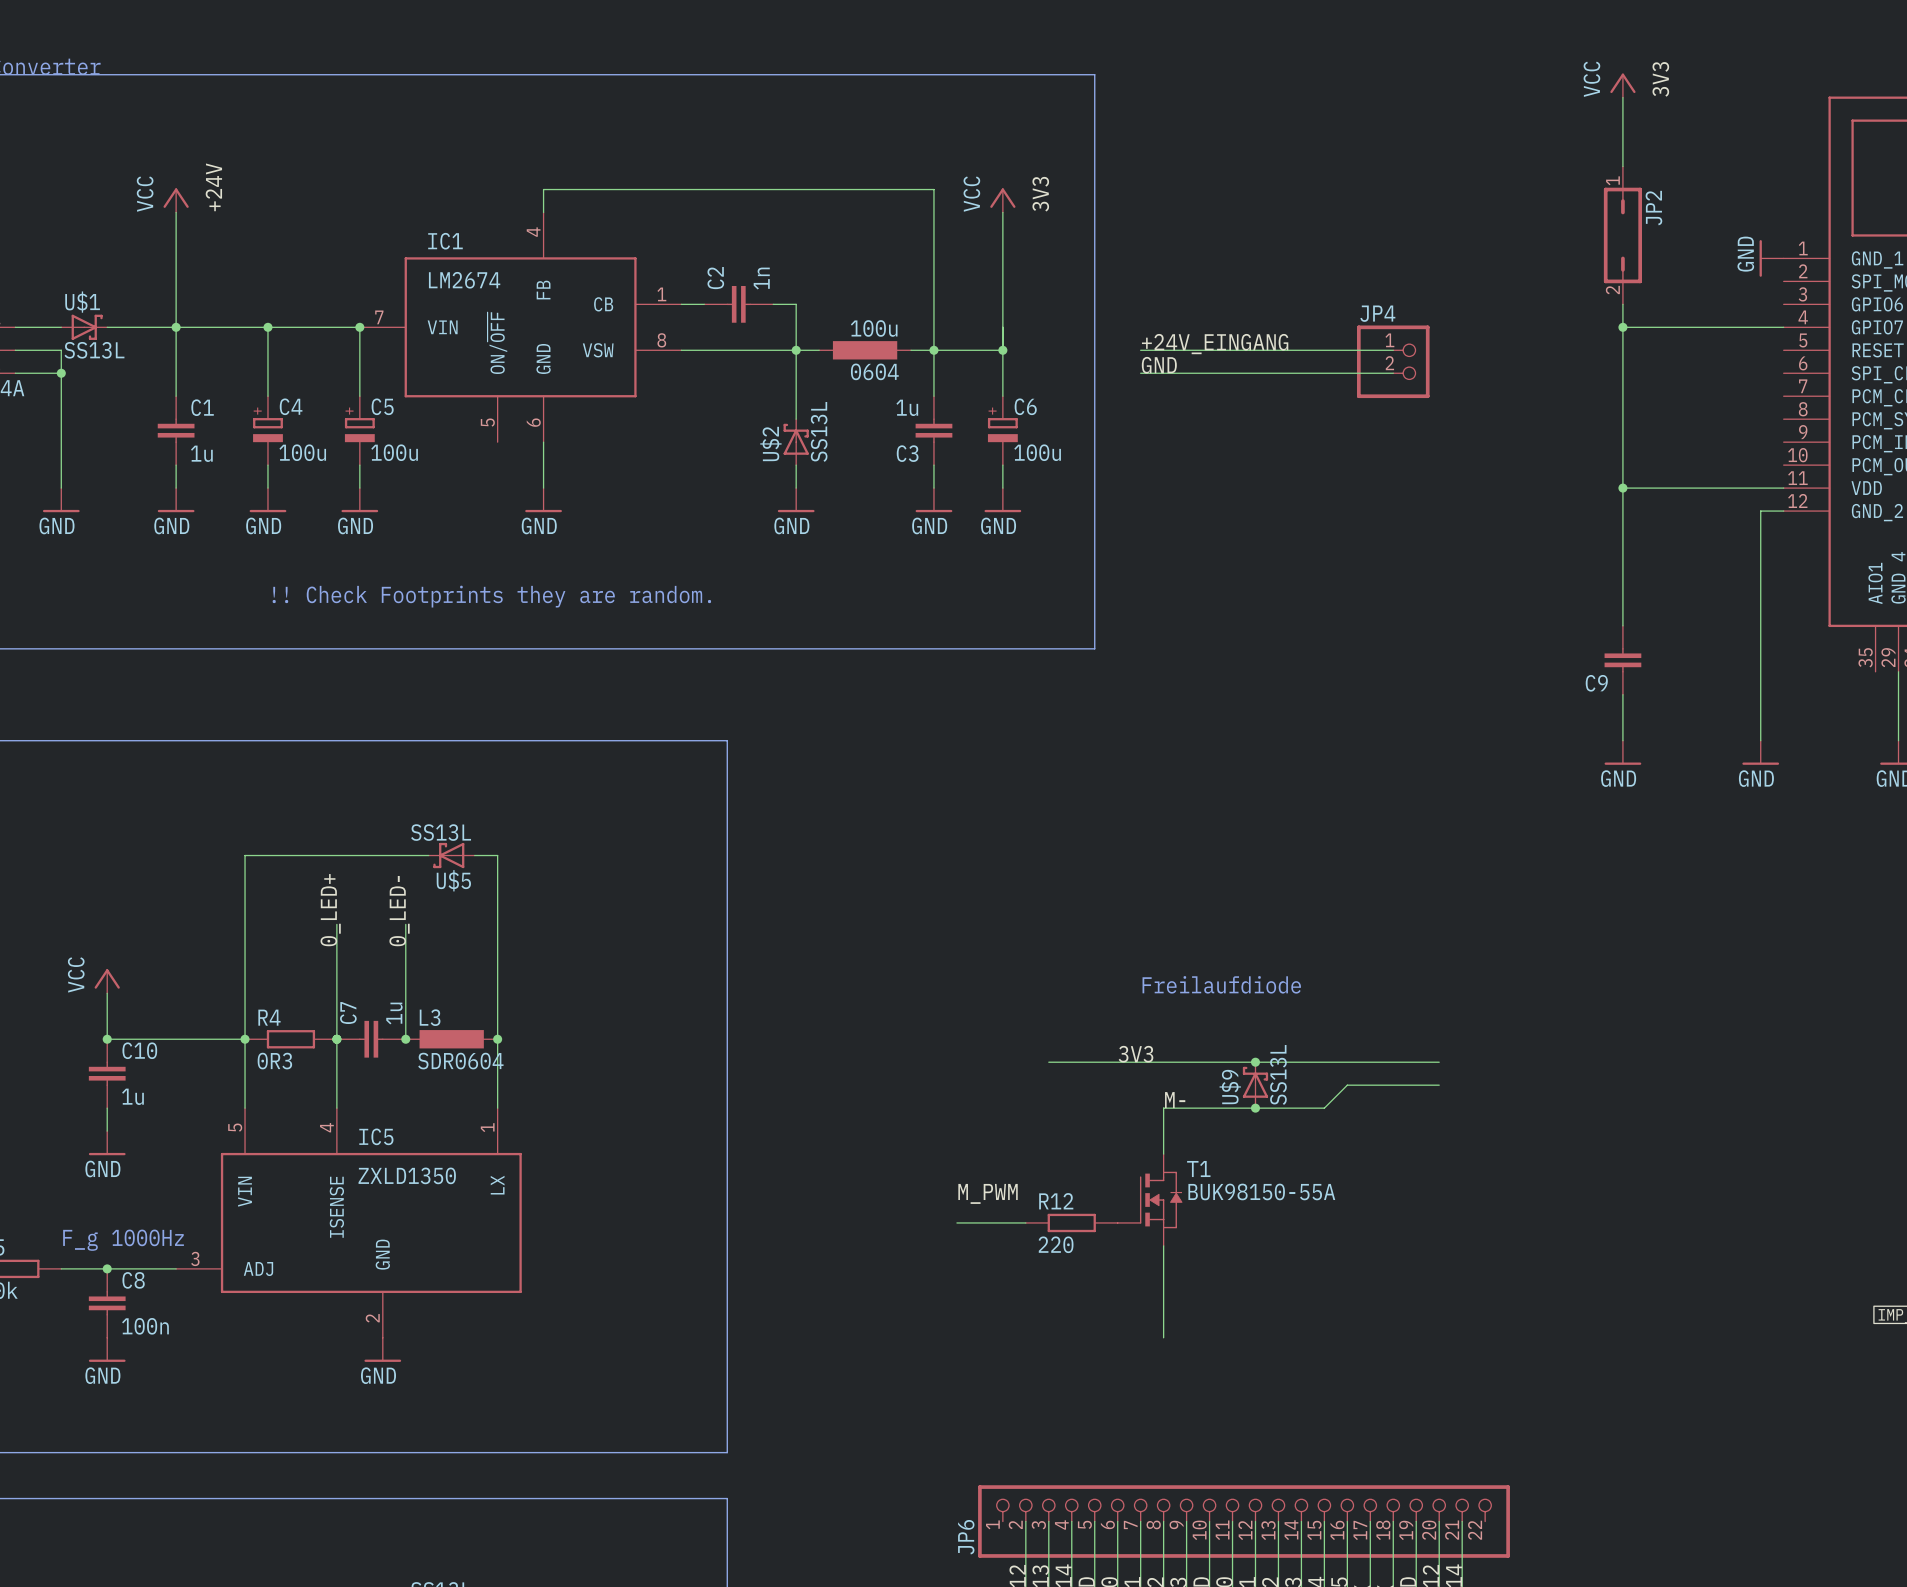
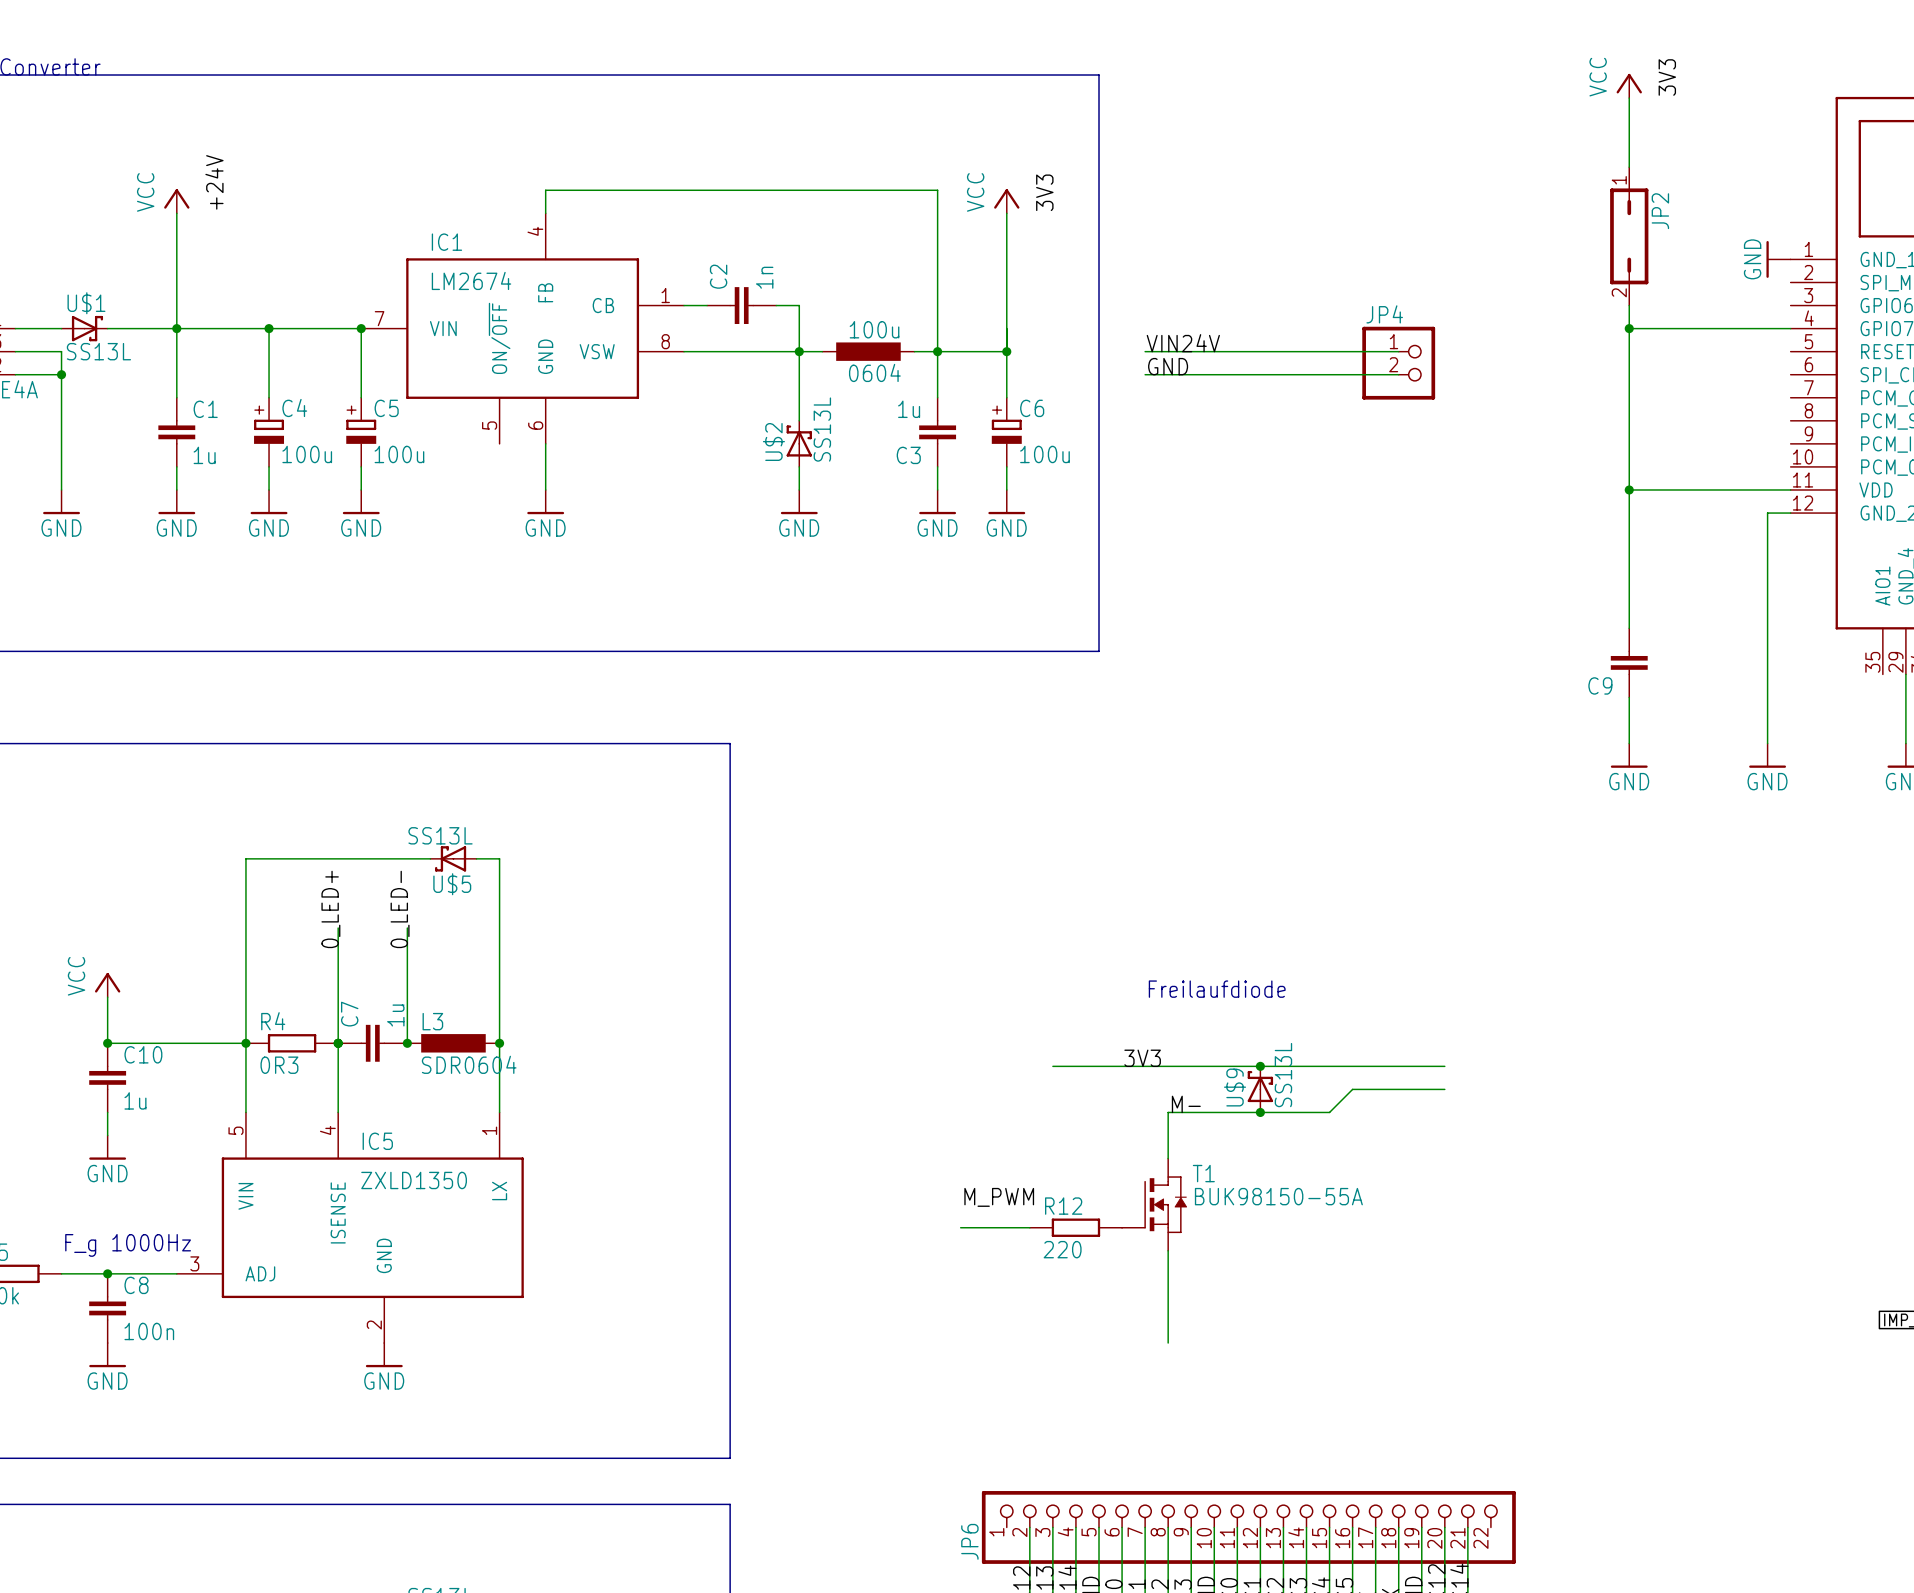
label: +24V_EINGANG (1215, 344) -> VIN24V (1183, 343)
text: !! Check Footprints they are random. (491, 596) -> none

